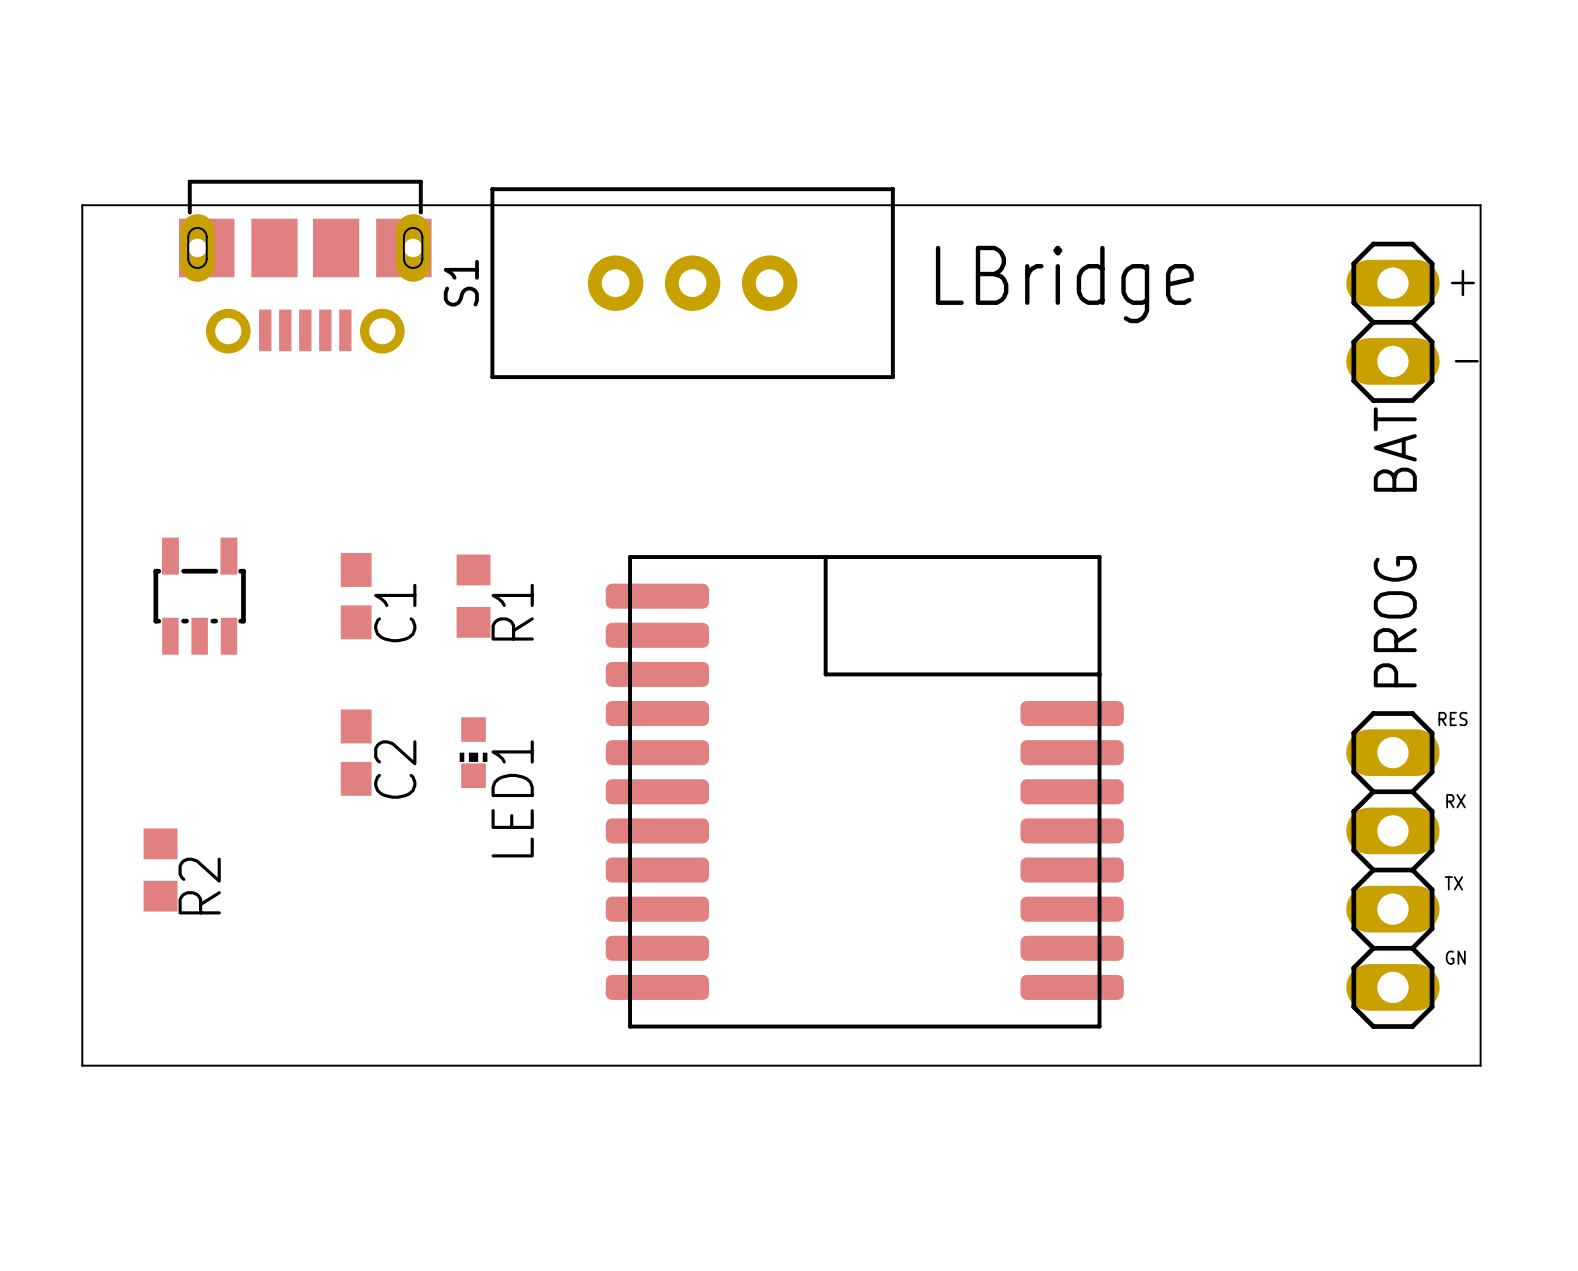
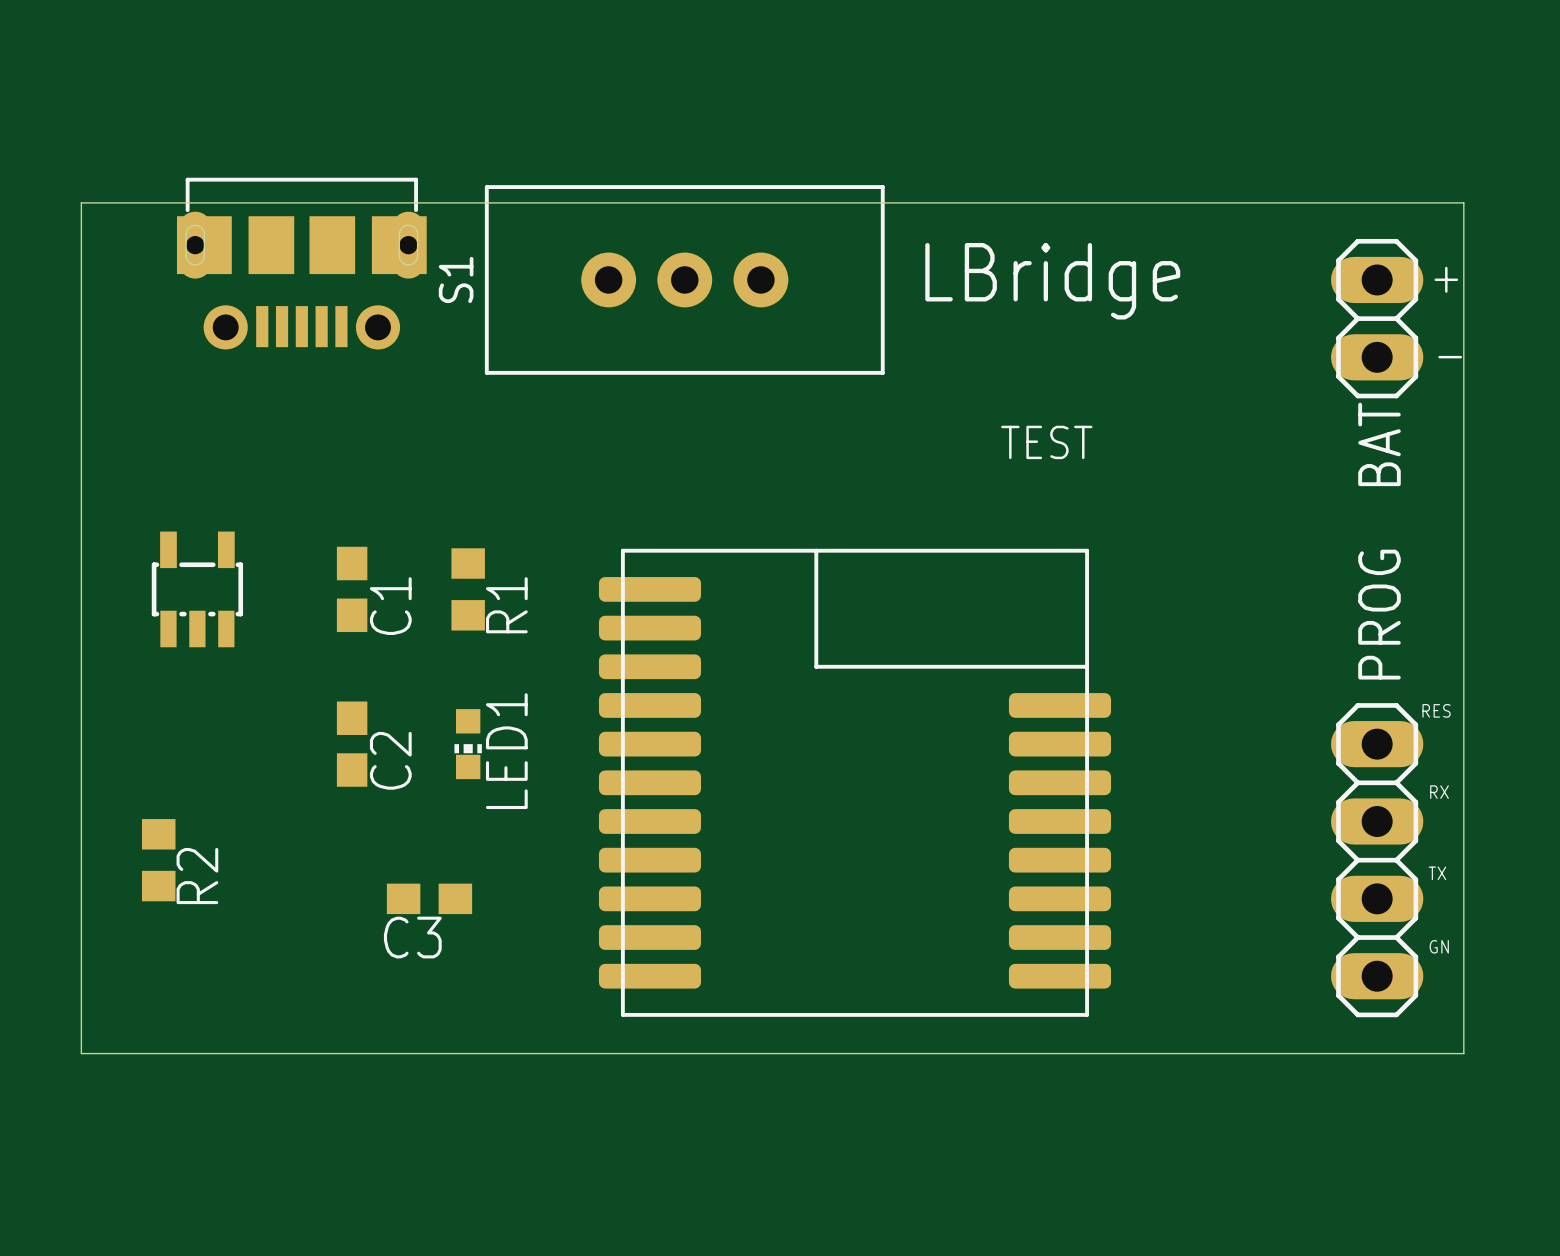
text: none -> TEST (1046, 442)
LED1 name position: LED1 (512, 798) -> LED1 (506, 751)
C3: none -> (429, 898)

